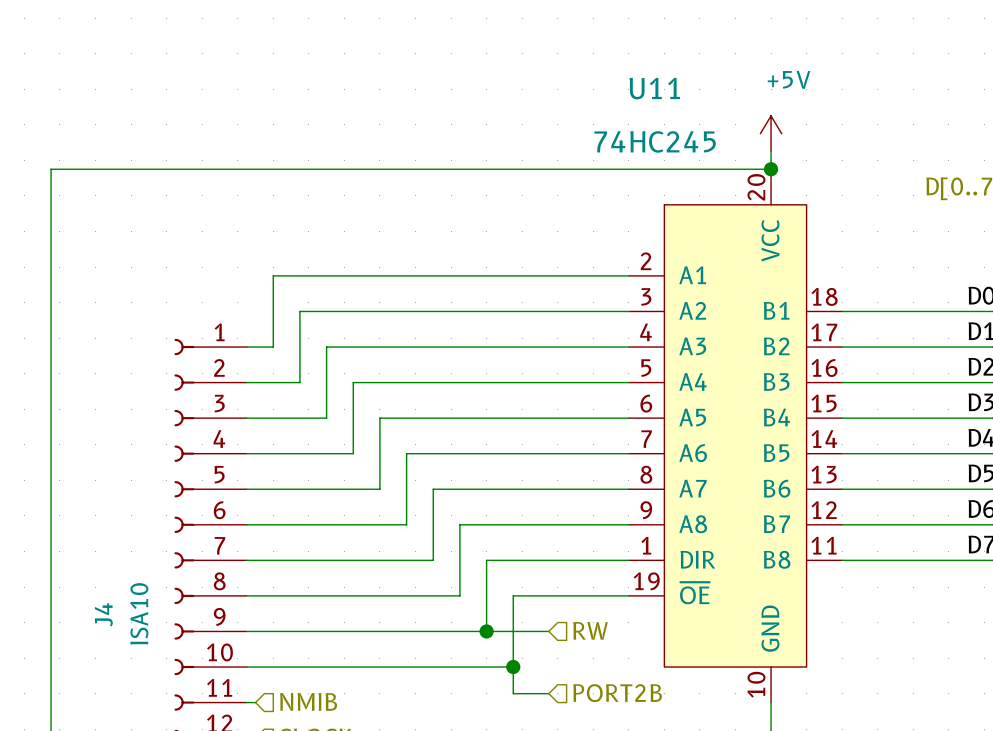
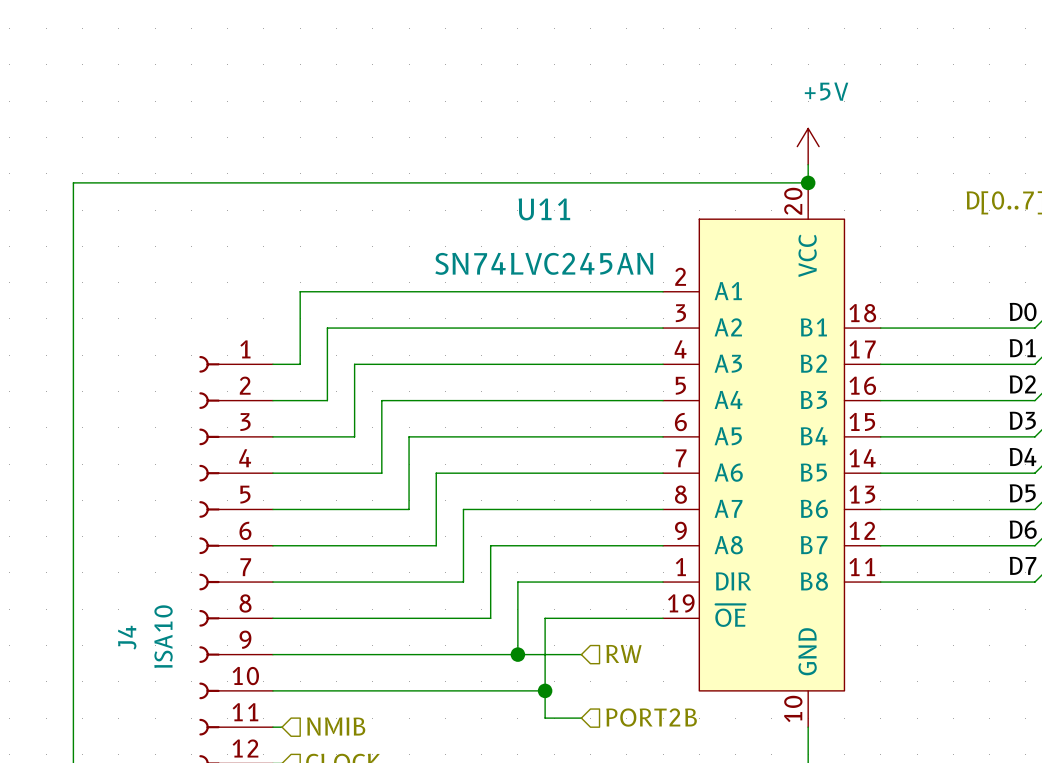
U11 name position: U11 (654, 88) -> U11 (544, 209)
U11 value: 74HC245 (655, 141) -> SN74LVC245AN (544, 263)

